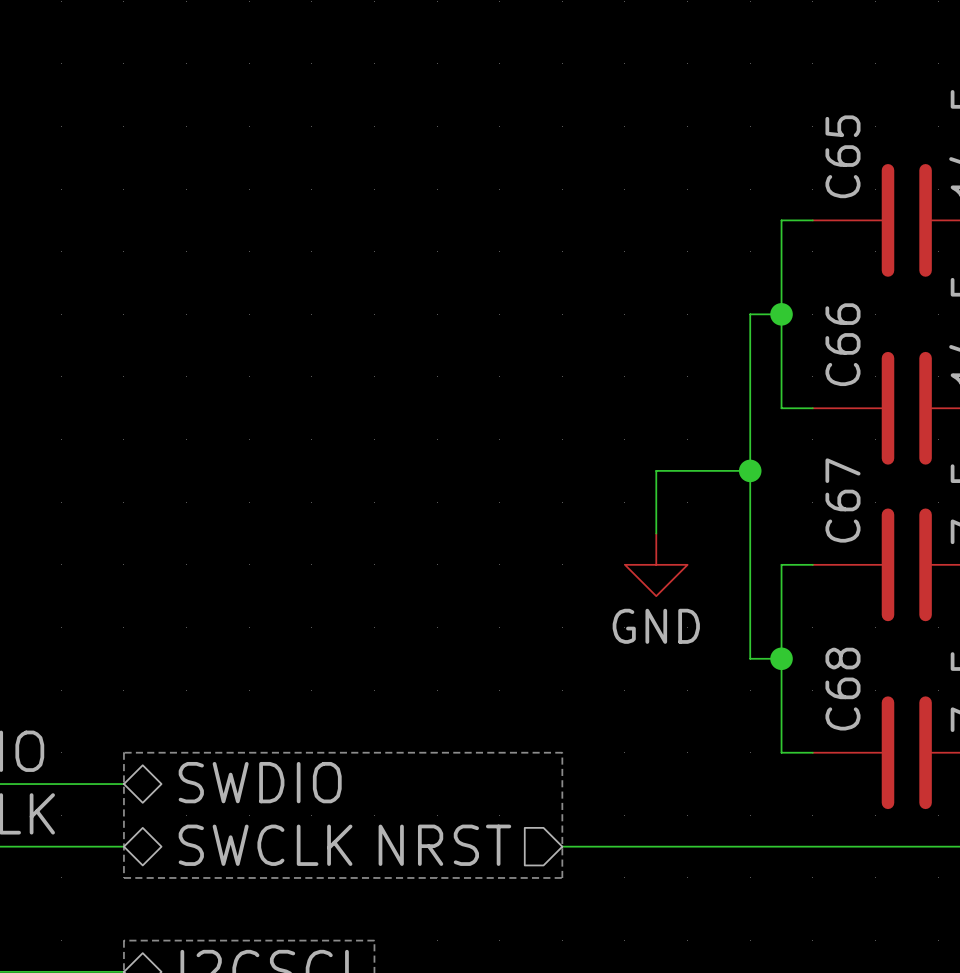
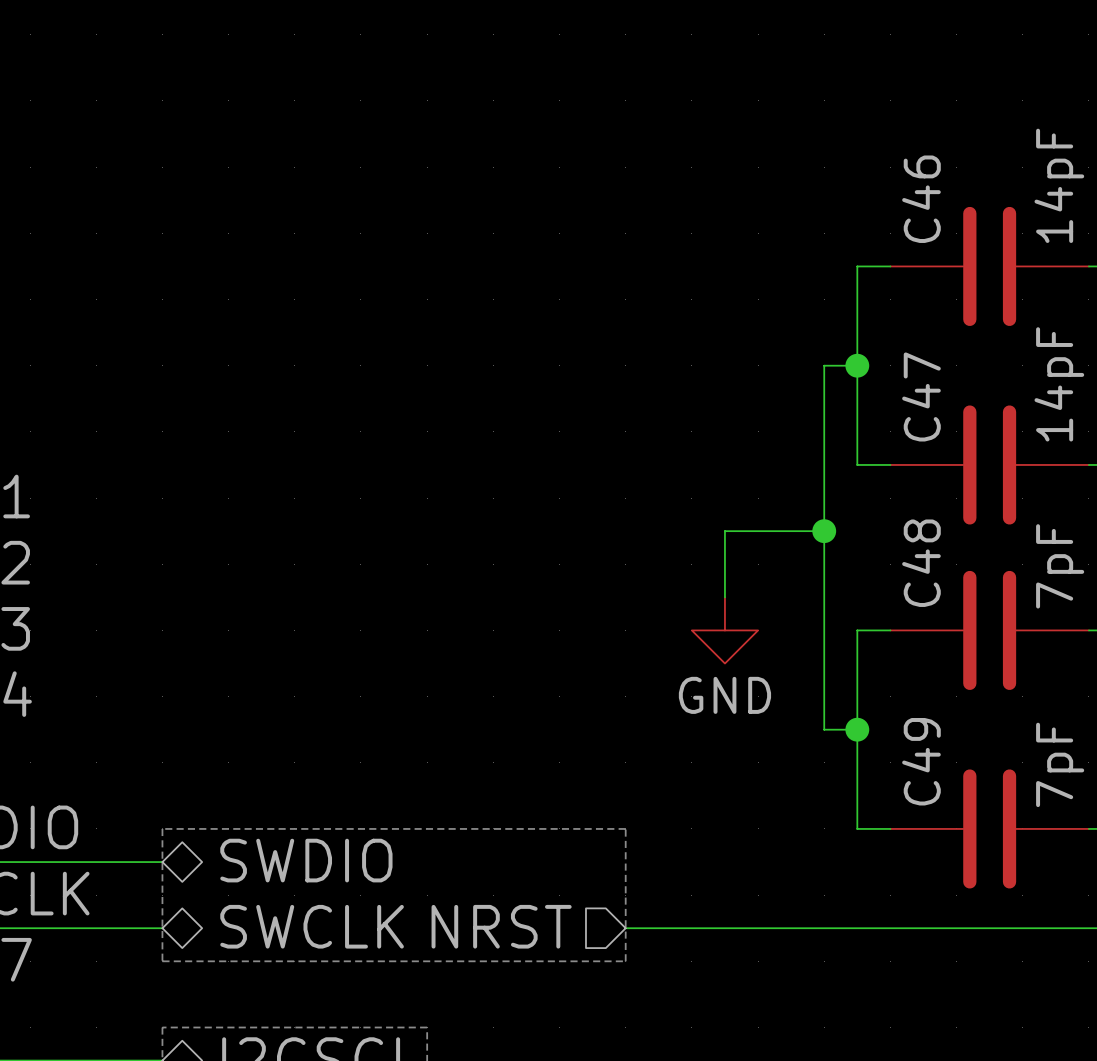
C65 name: C65 (842, 156) -> C46 (921, 199)
C66 name: C66 (842, 344) -> C47 (921, 396)
C67 name: C67 (842, 500) -> C48 (921, 563)
C68 name: C68 (842, 689) -> C49 (921, 761)

